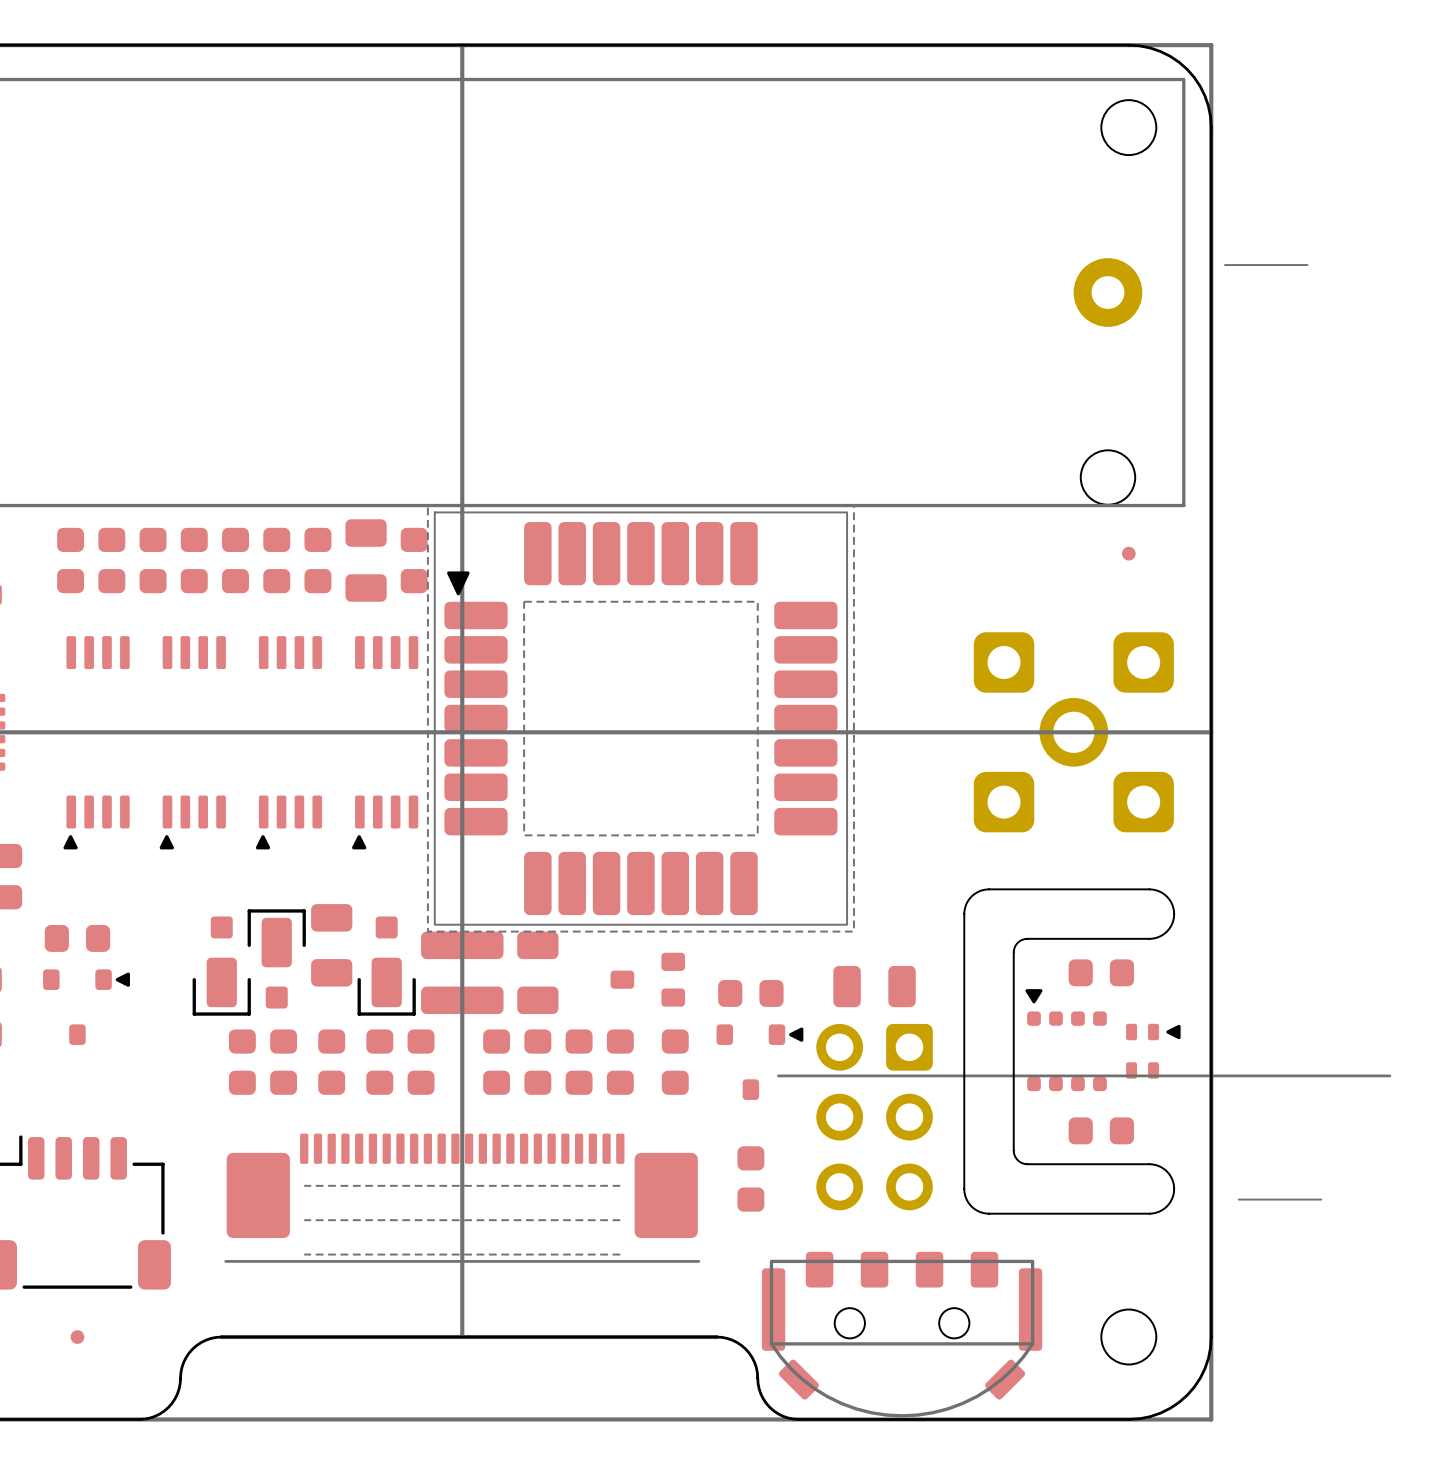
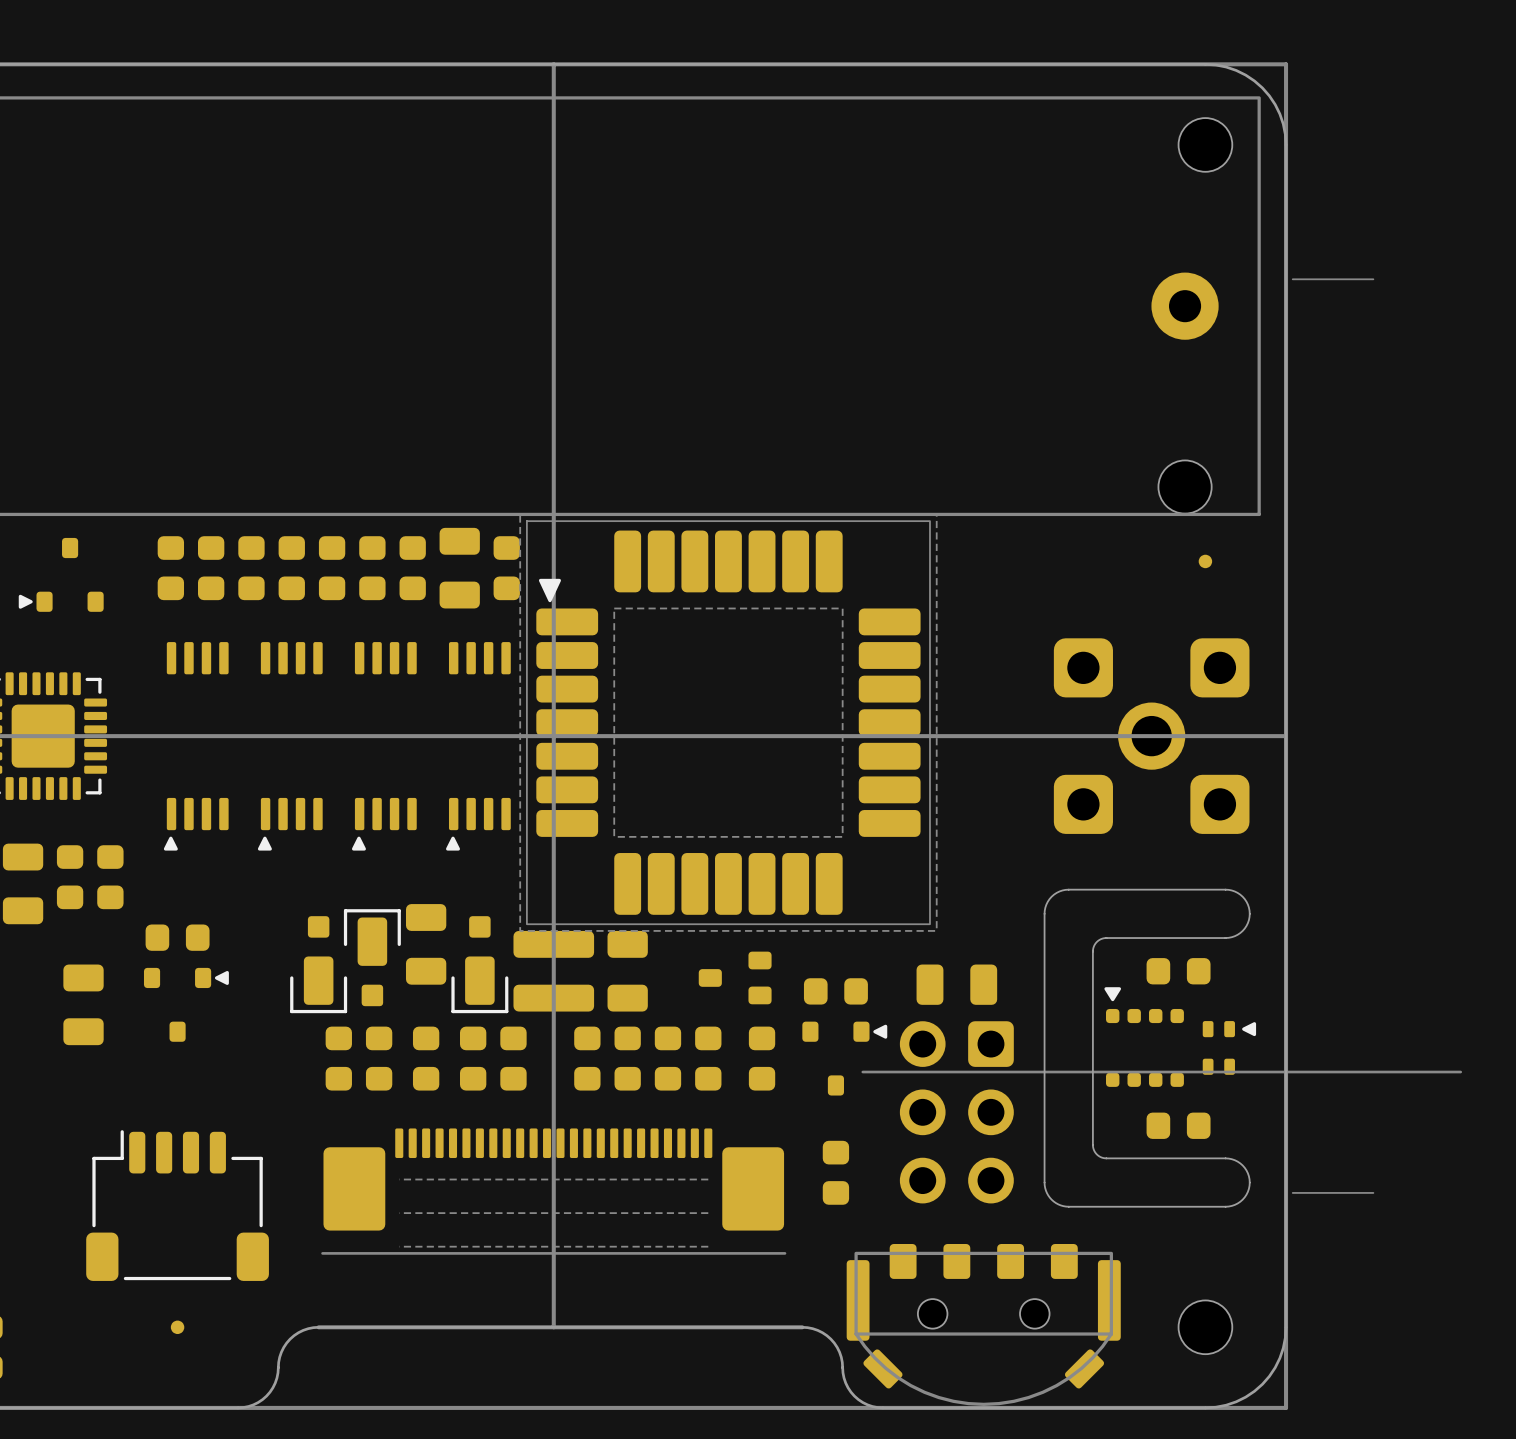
line: (1300, 265) (1307, 265) -> (1292, 279) (1299, 279)
line: (1300, 1199) (1321, 1199) -> (1292, 1192) (1312, 1192)

